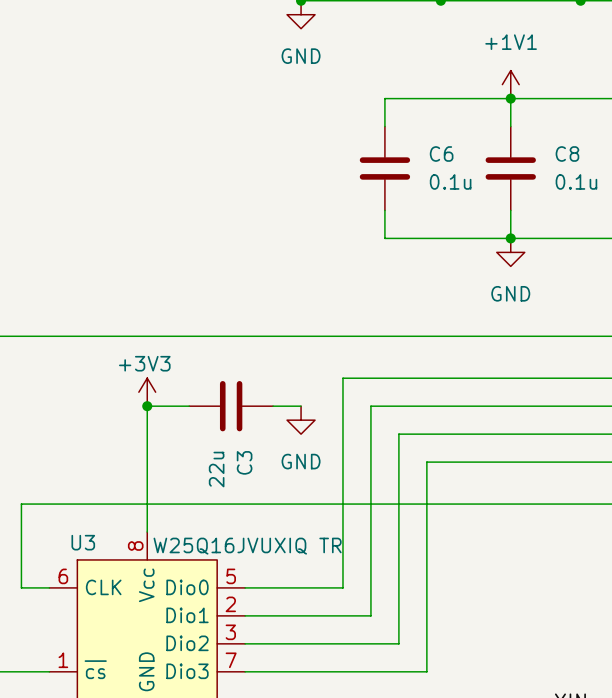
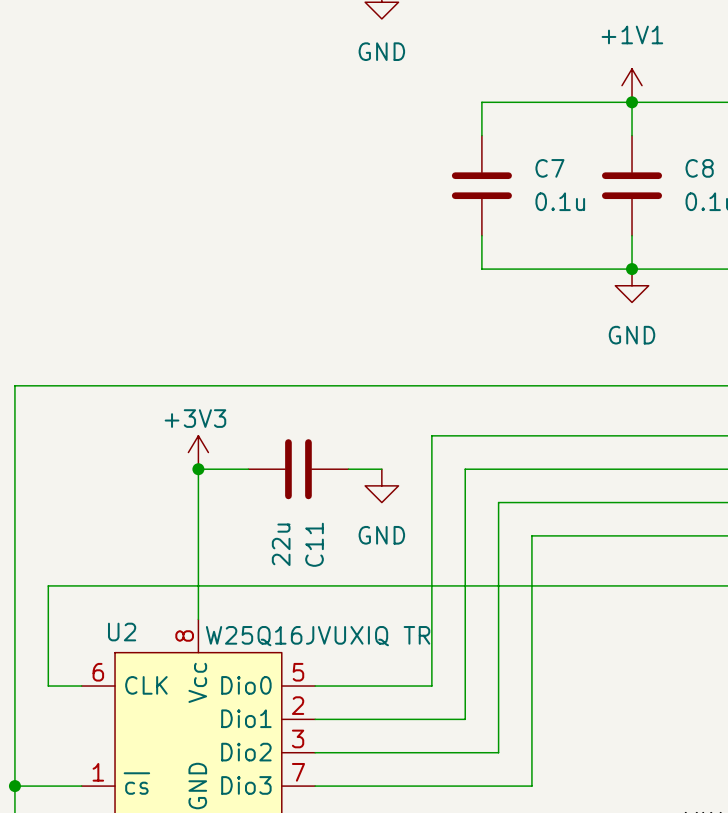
C6 name: C6 (441, 154) -> C7 (549, 168)
C3 name: C3 (244, 462) -> C11 (314, 544)
U3 name: U3 (83, 542) -> U2 (122, 632)

